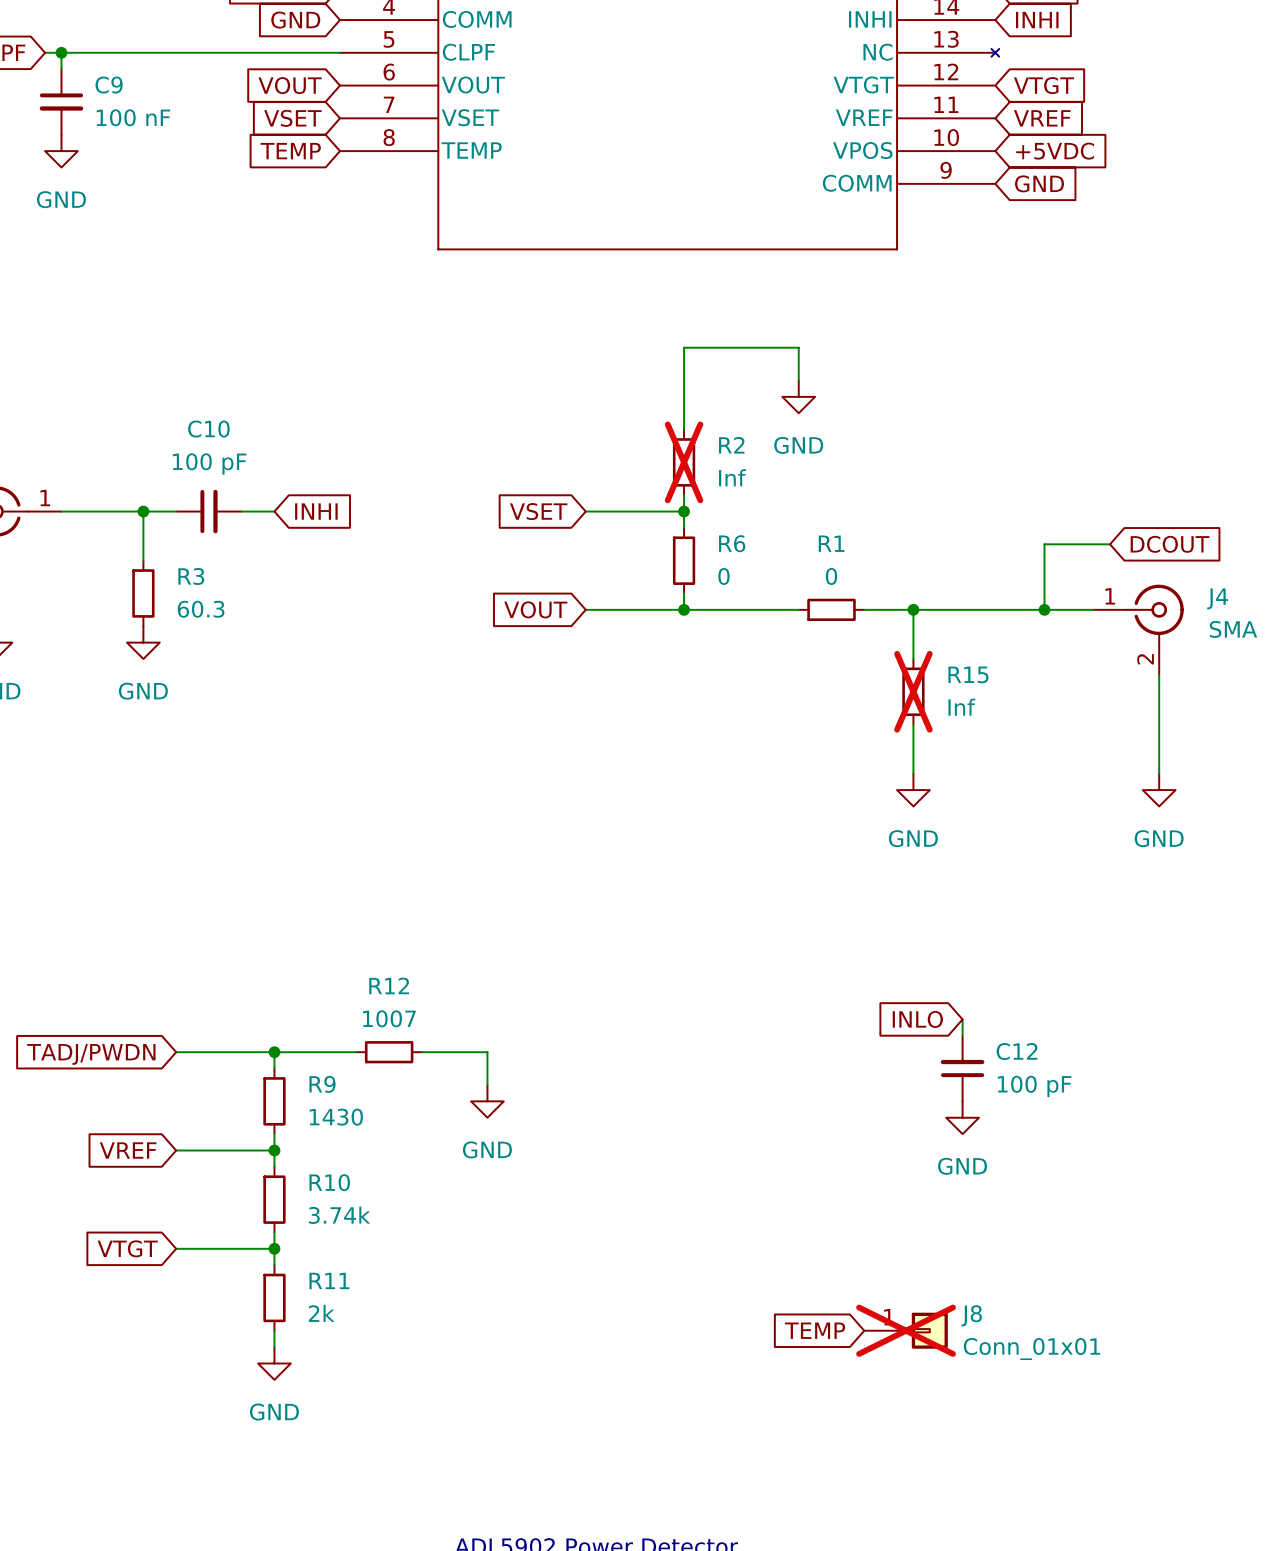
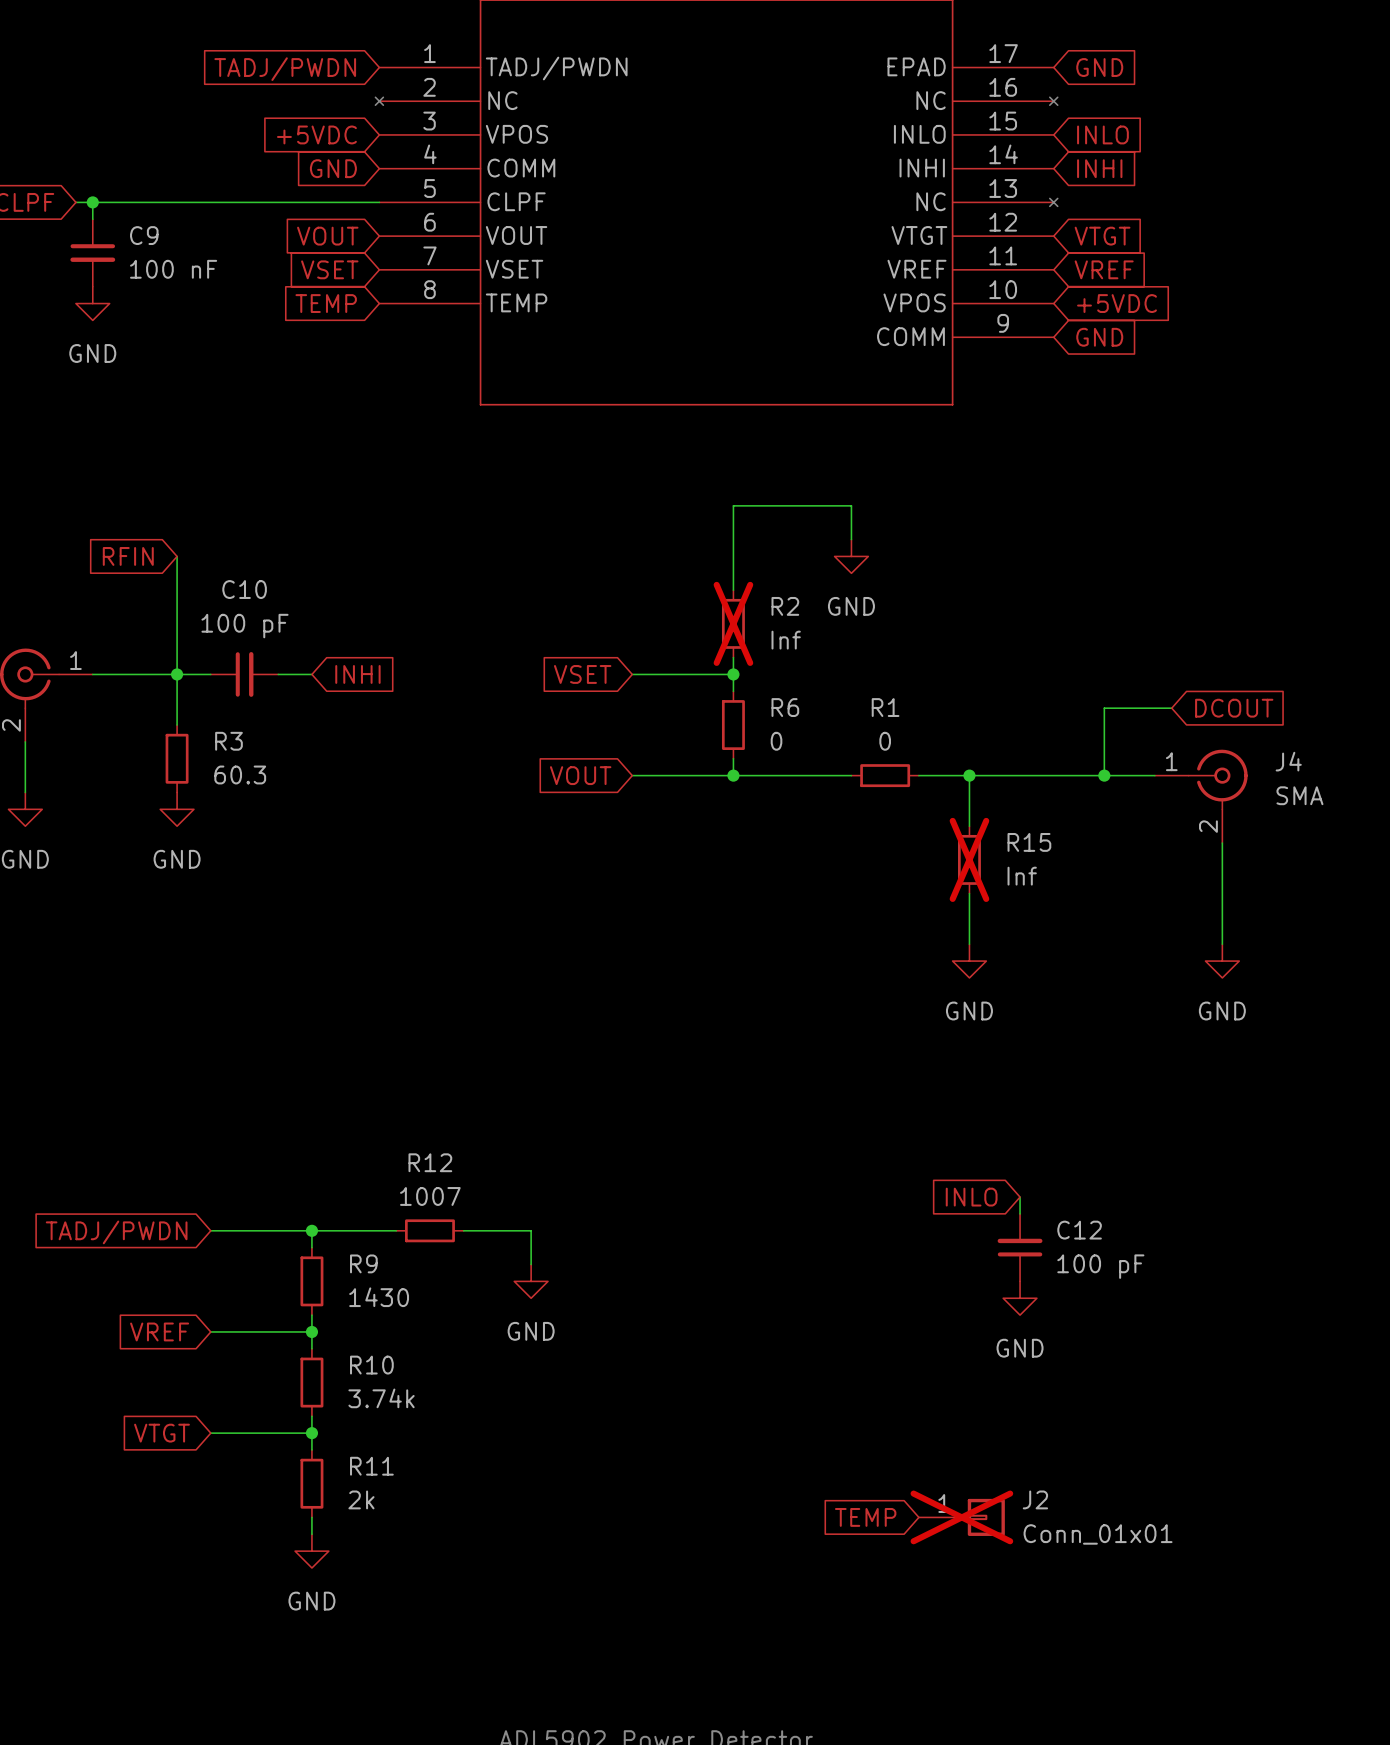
global label: none -> RFIN (128, 556)
wire: none -> (177, 556) (177, 674)
J8 name: J8 (971, 1315) -> J2 (1035, 1499)

